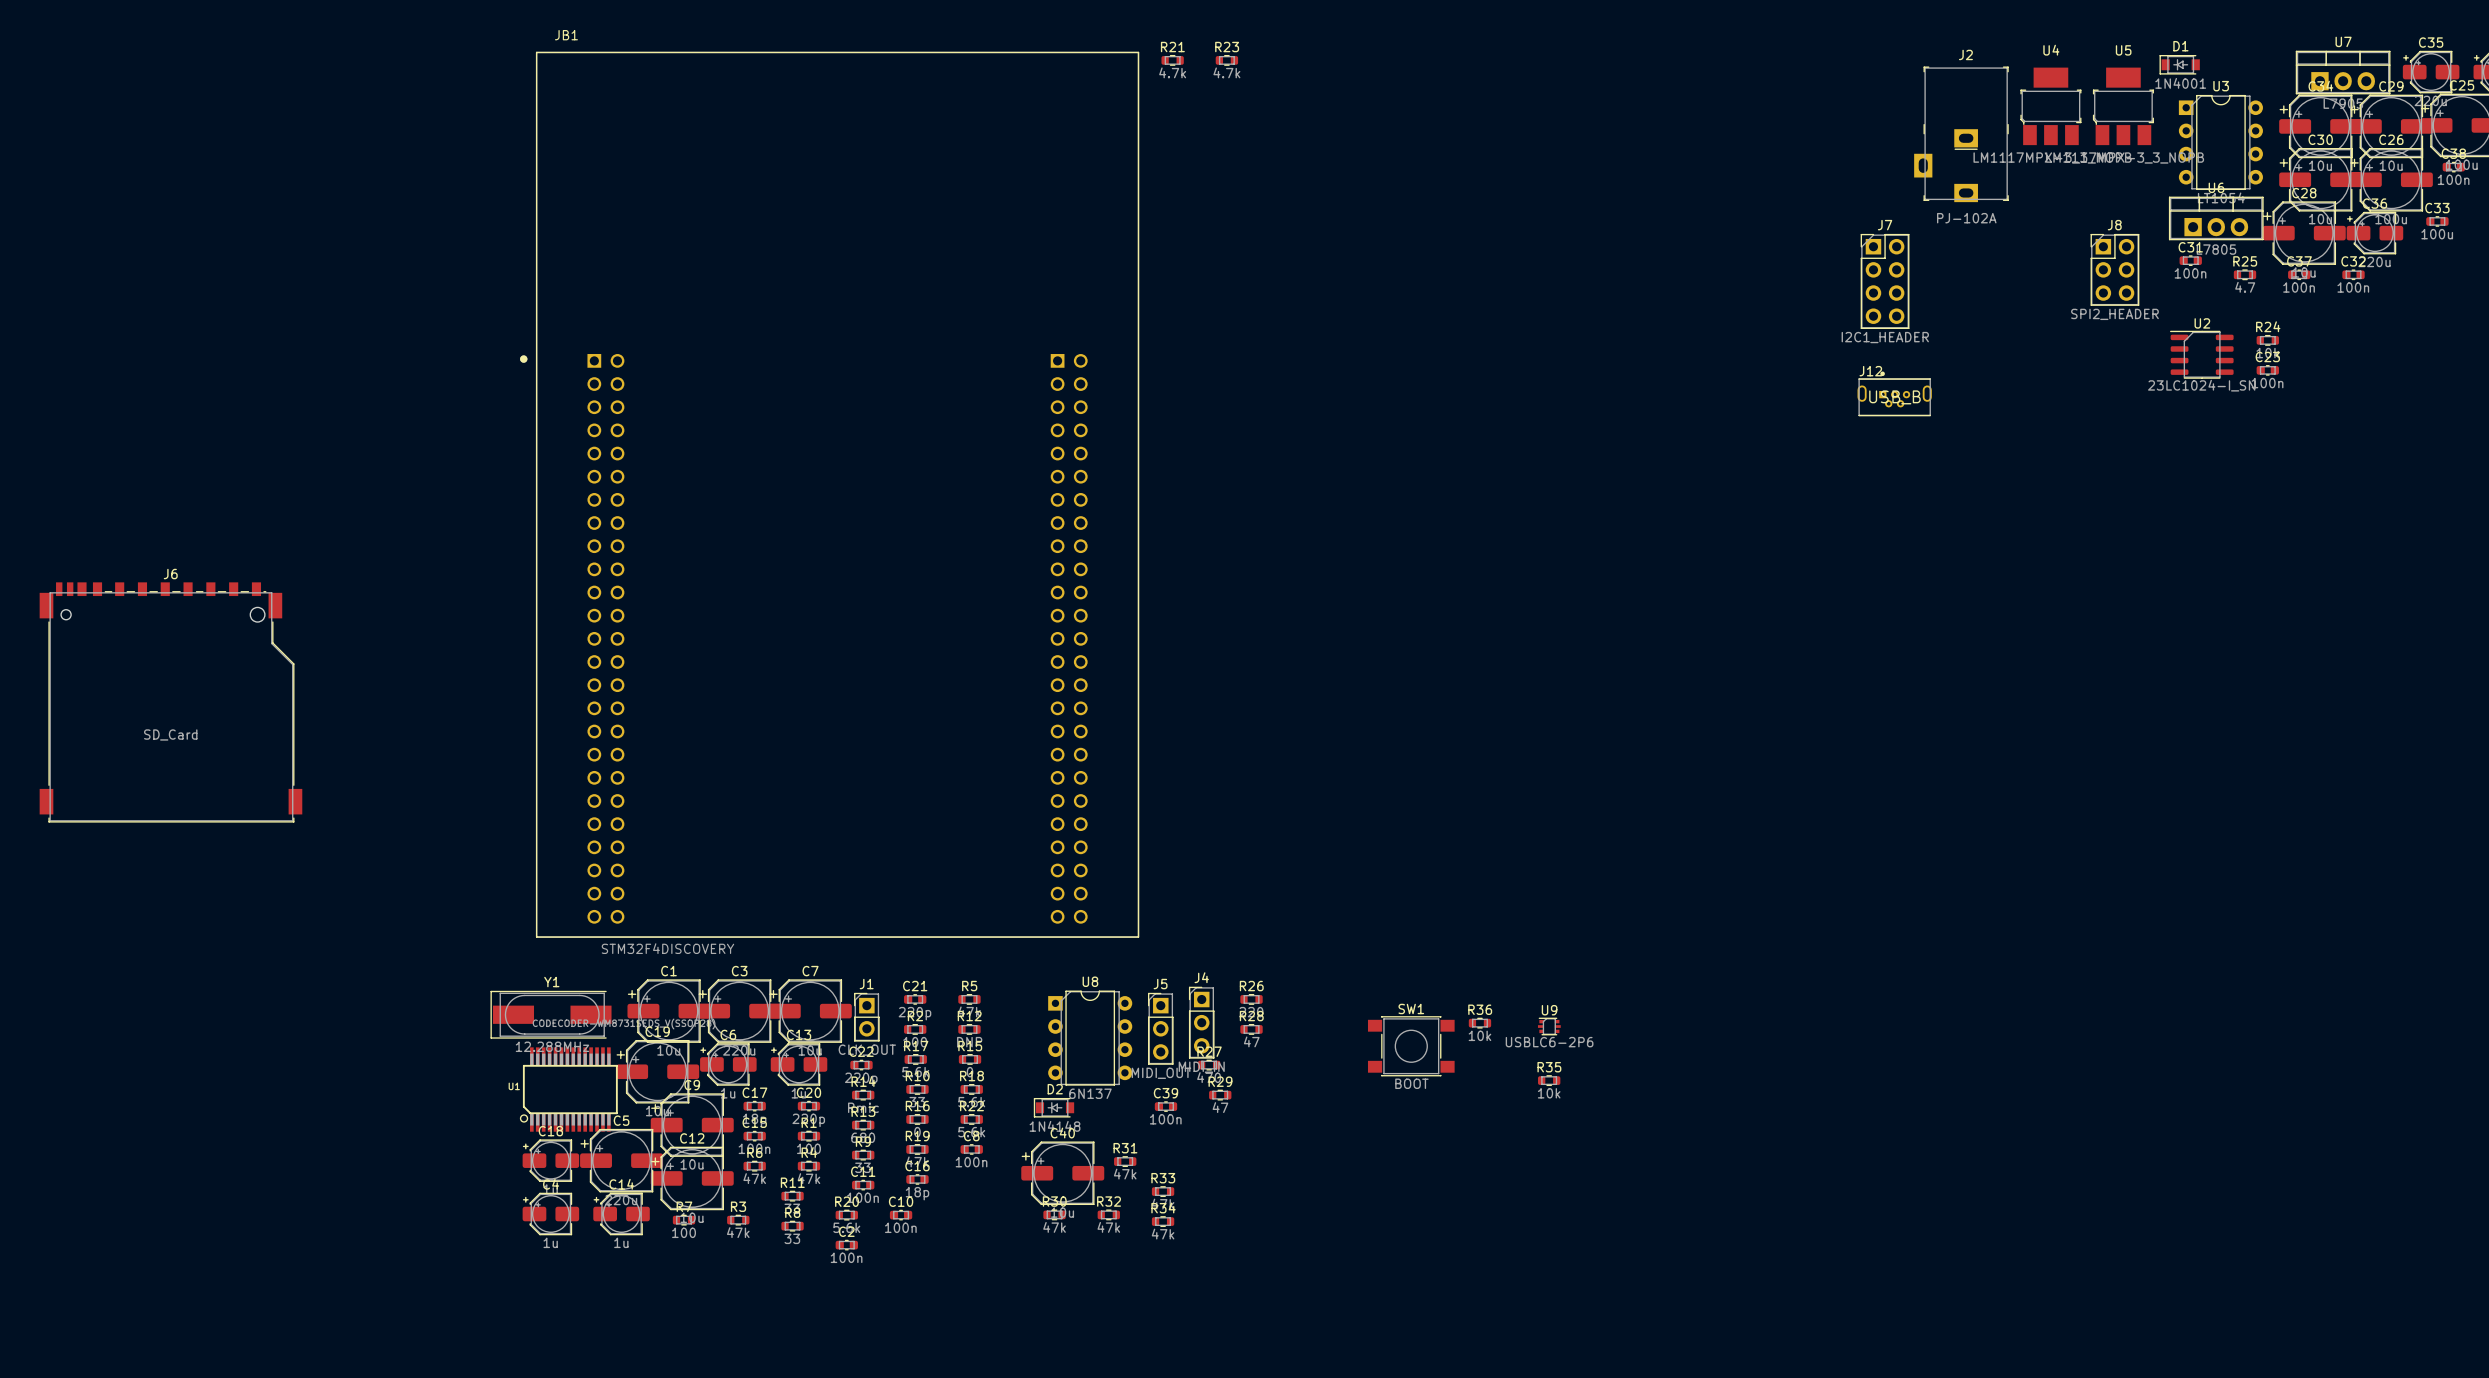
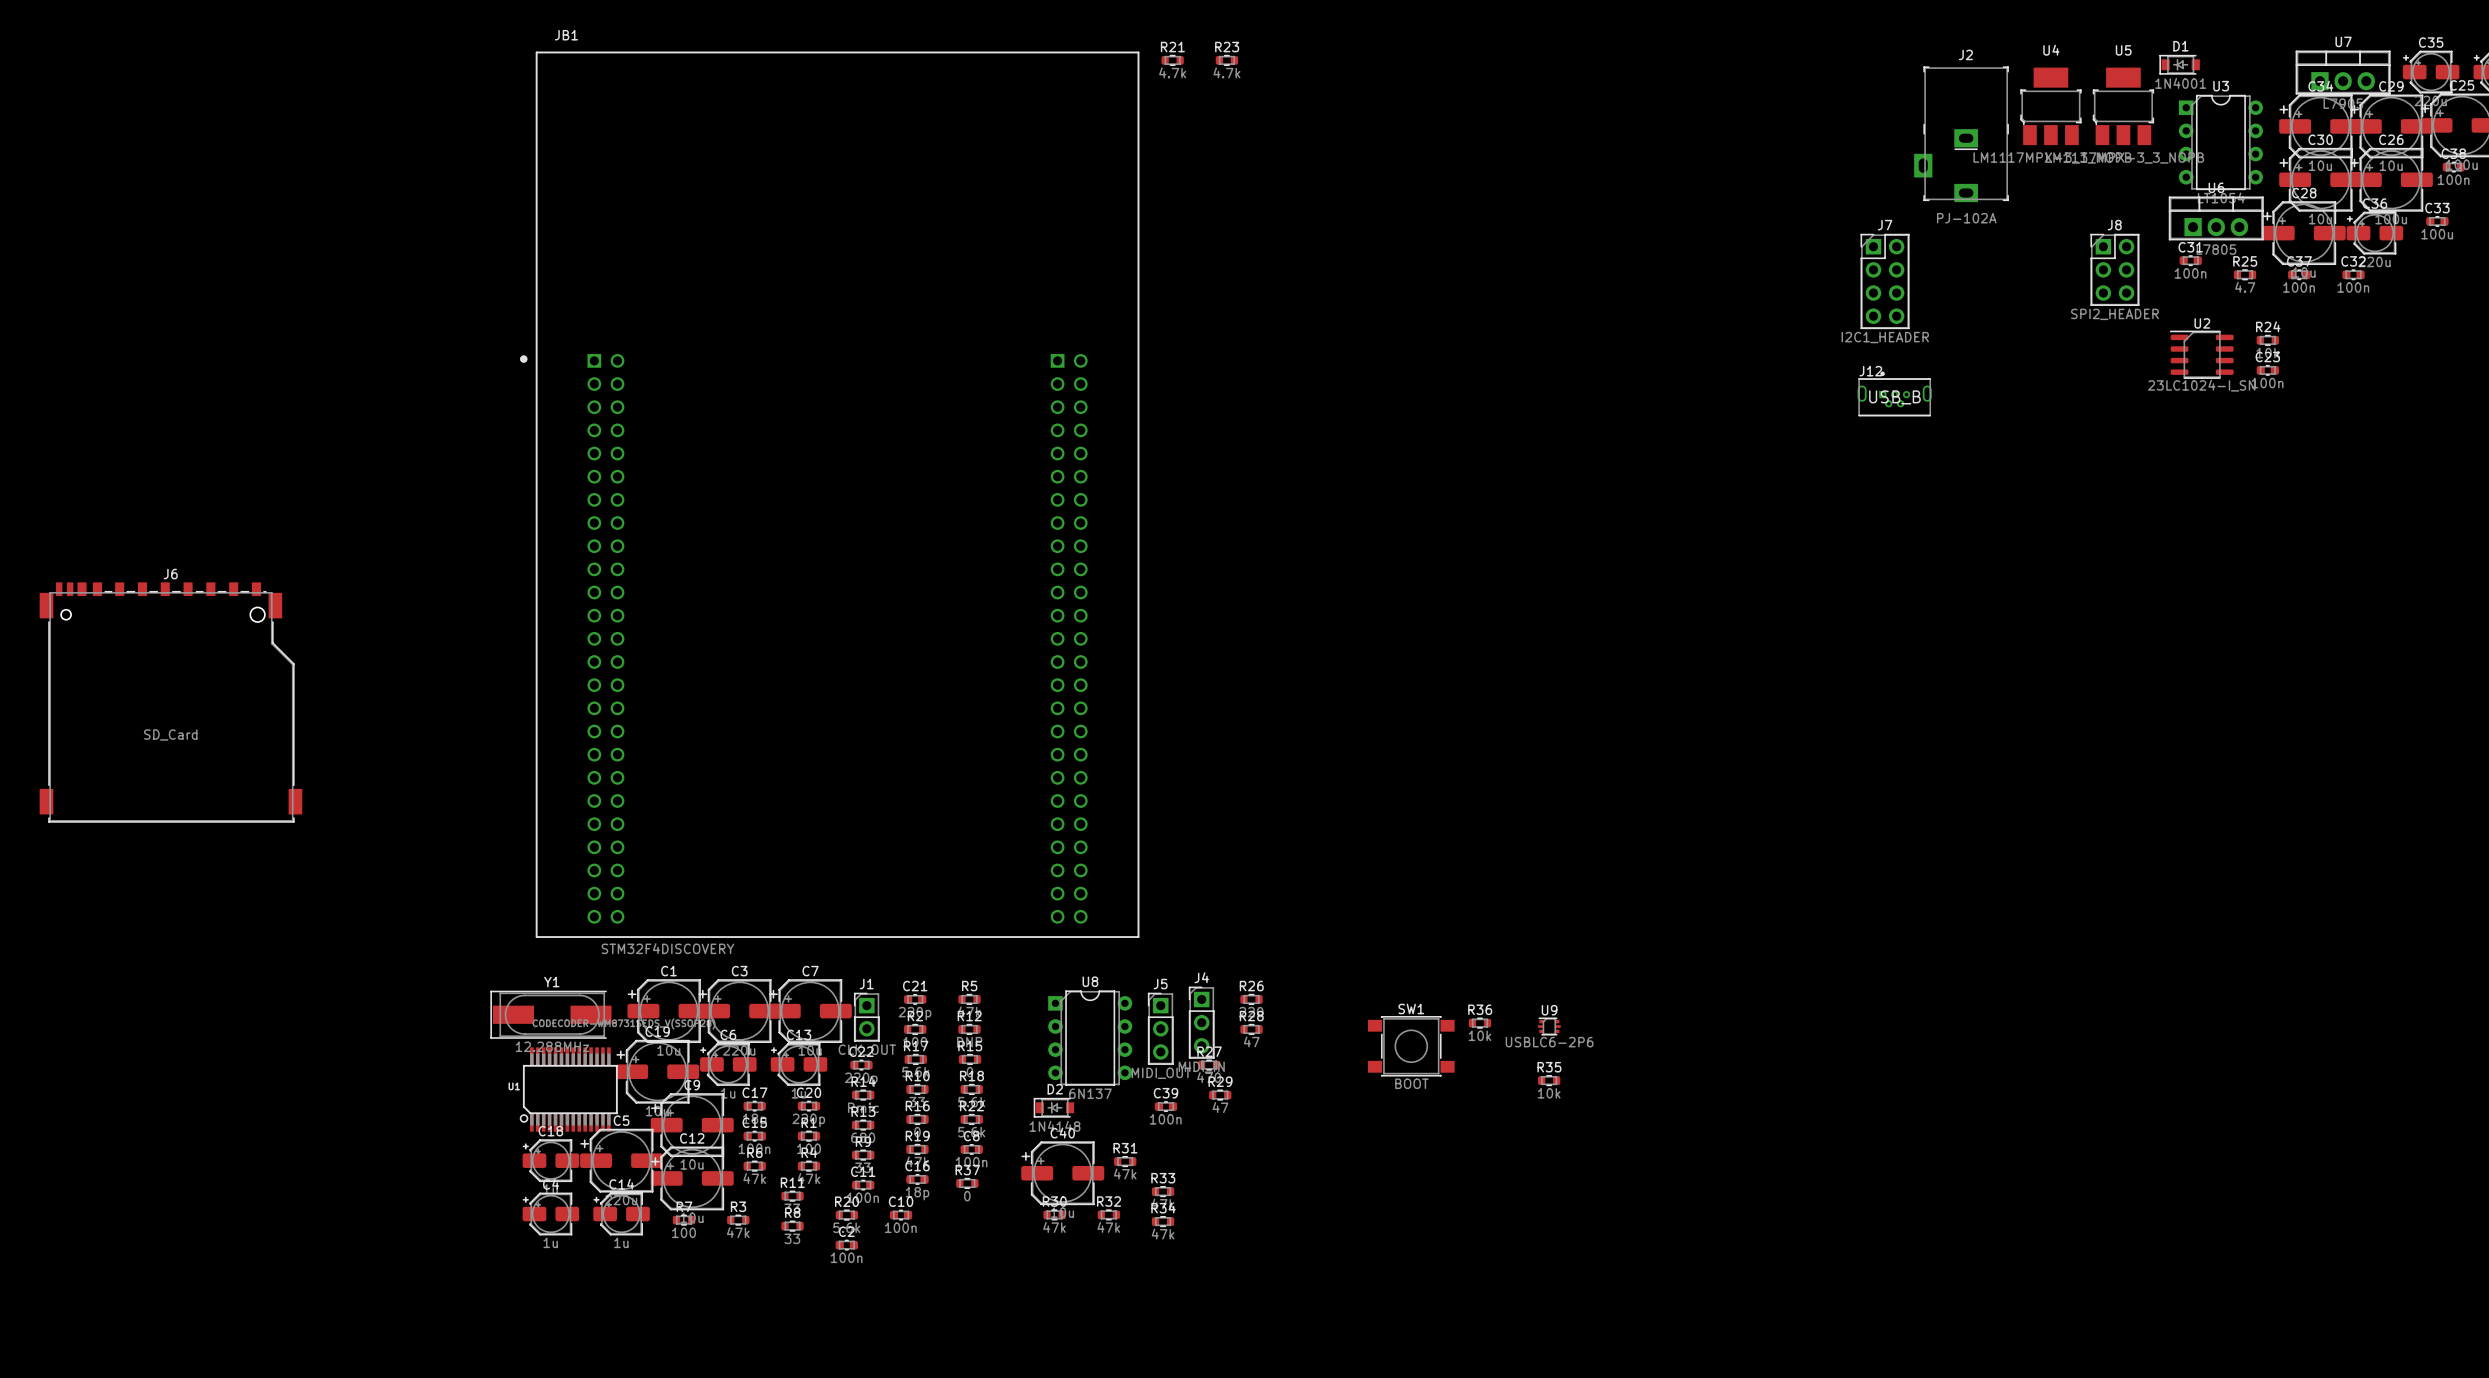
R37: none -> 0 (967, 1183)

